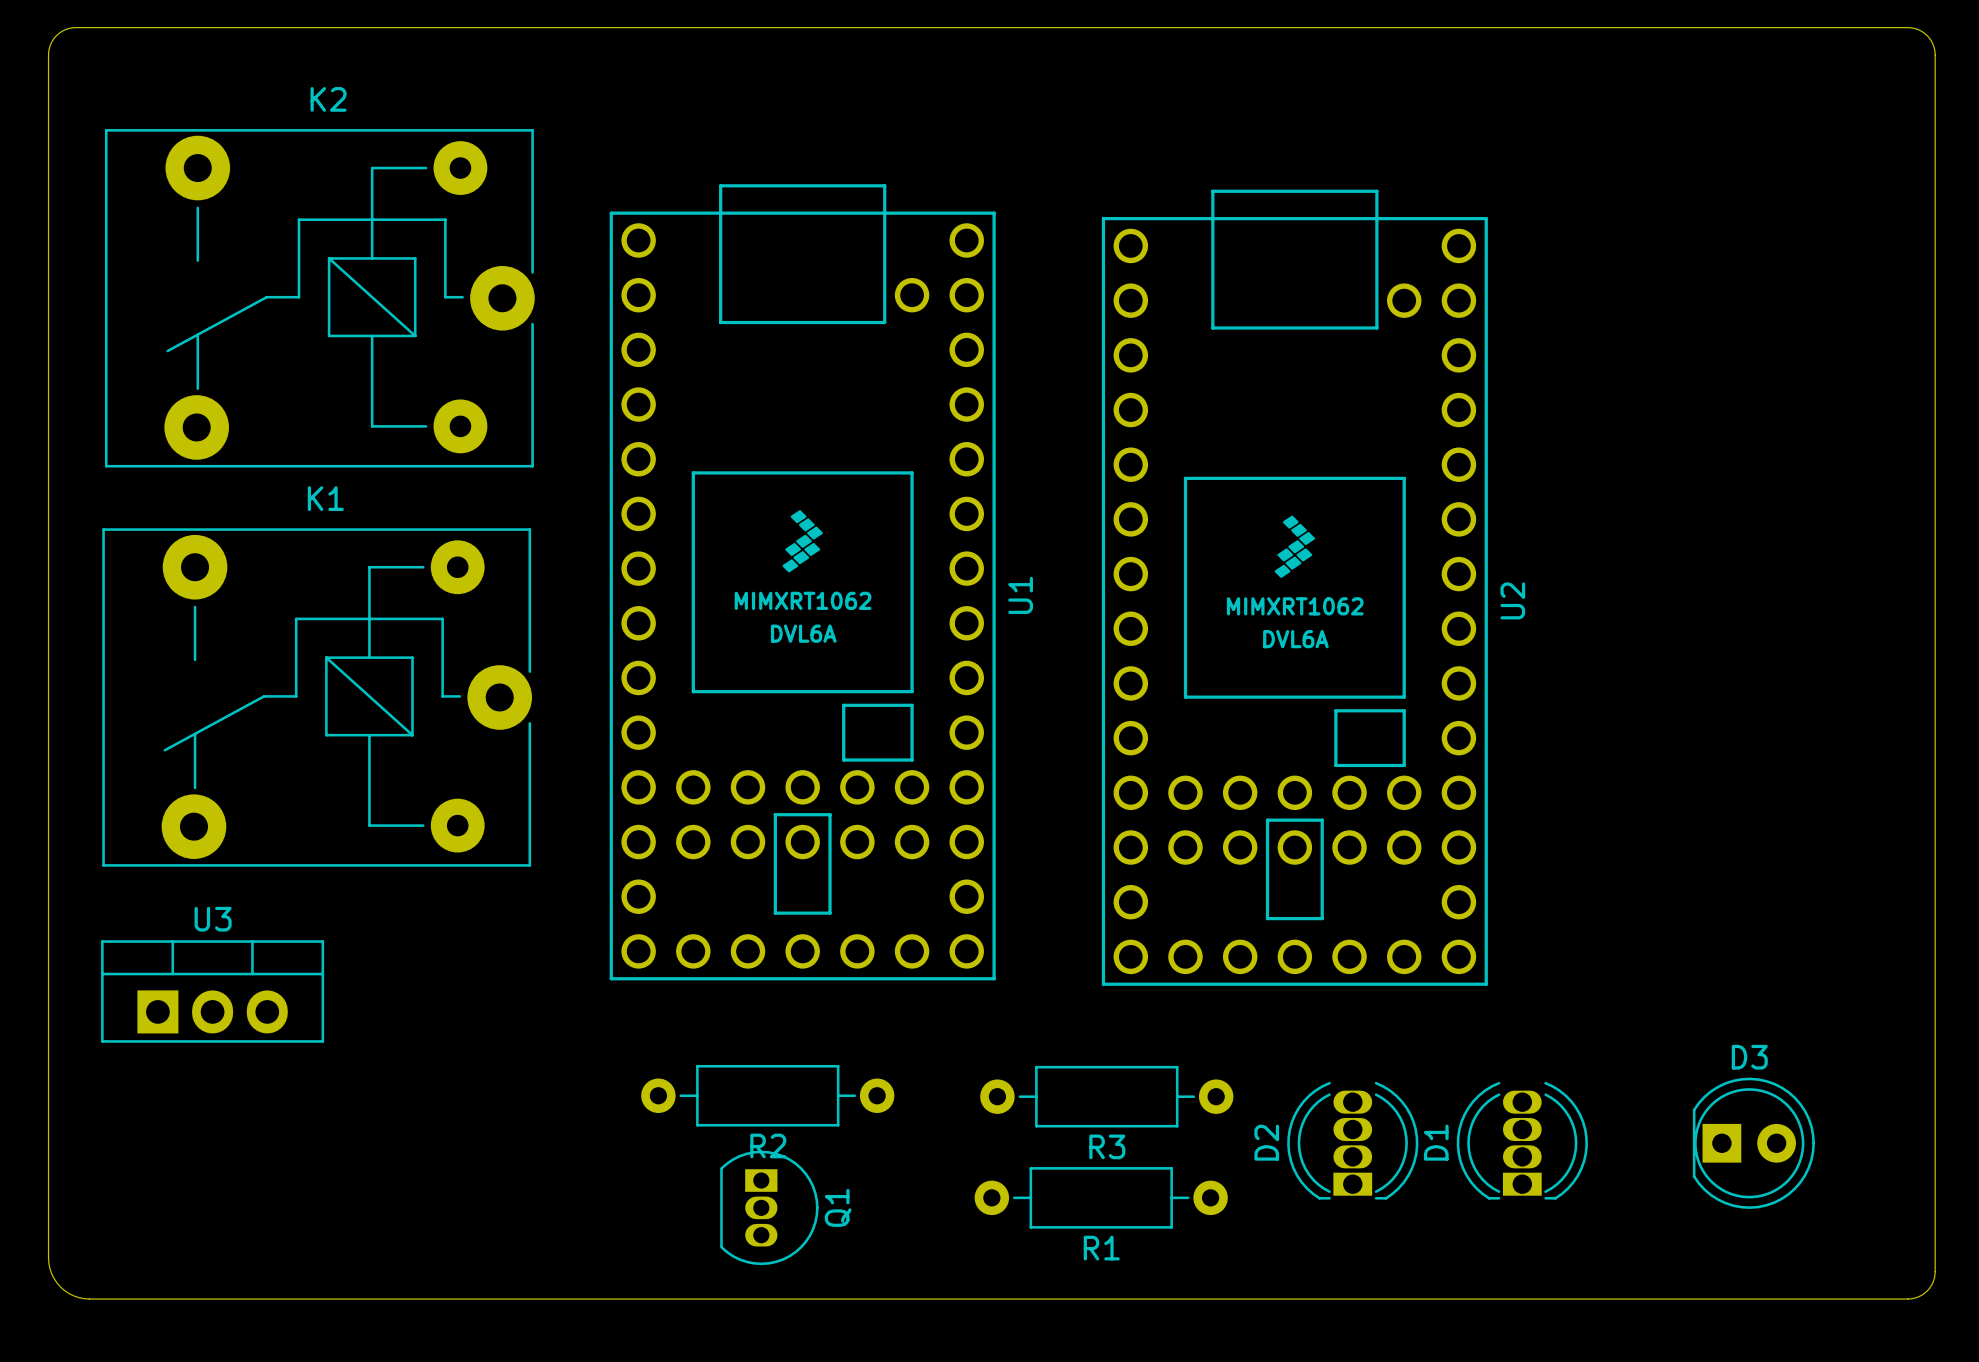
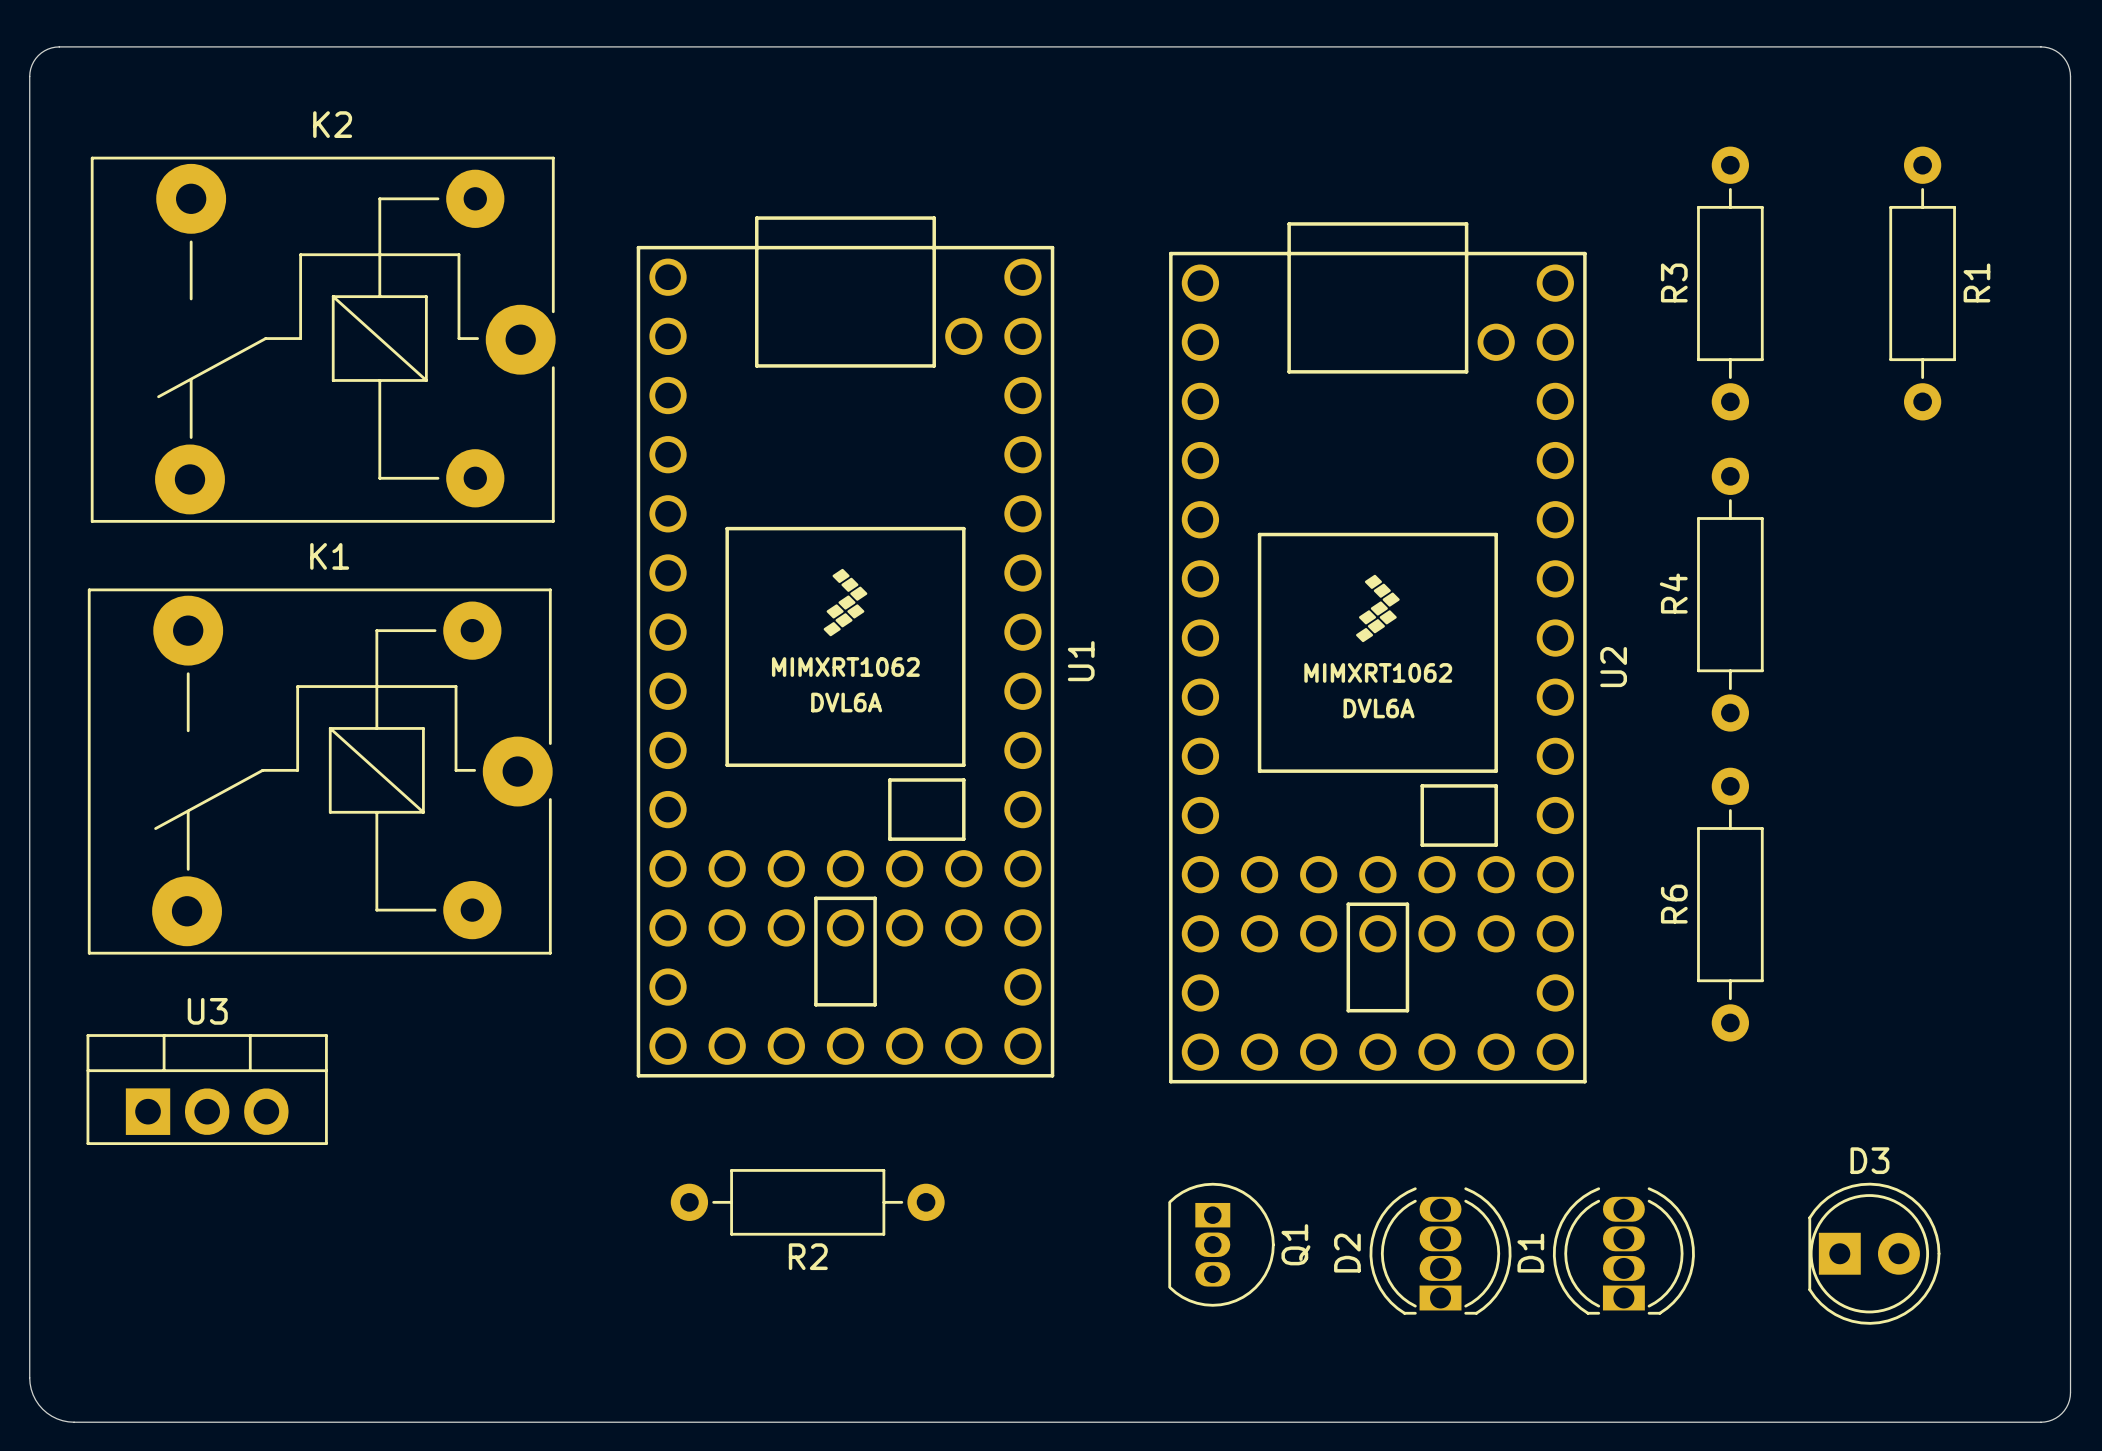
R4: none -> (1730, 594)
R6: none -> (1730, 904)
R3 rotation: 0° (1106, 1096) -> 90° clockwise (1730, 283)
R3 position: (1106, 1096) -> (1730, 283)
R1 rotation: 0° (1101, 1197) -> 90° clockwise (1922, 283)
R1 position: (1101, 1197) -> (1922, 283)
Q1 position: (769, 1207) -> (1221, 1244)
R1 name position: R1 (1101, 1248) -> R1 (1976, 282)

